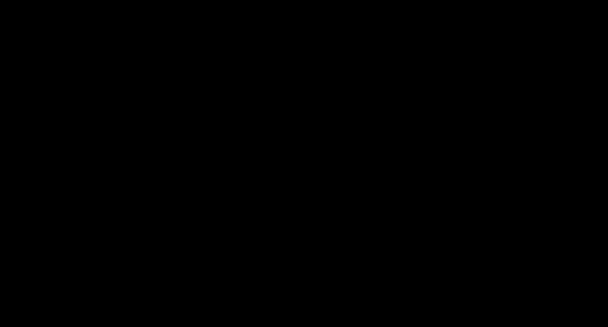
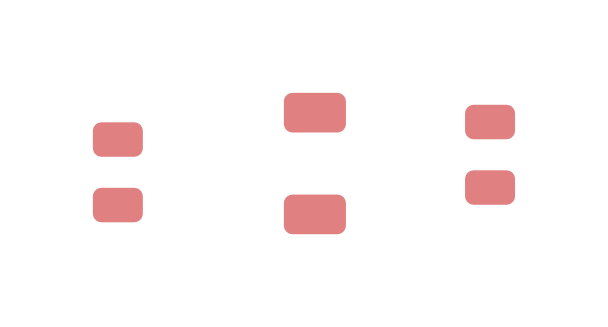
part: none -> (490, 154)
part: none -> (314, 163)
part: none -> (117, 172)

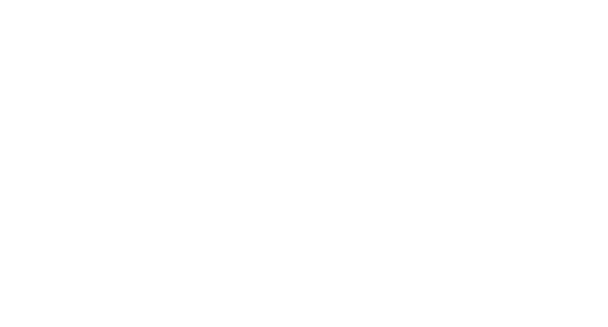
part: (490, 154) -> none
part: (314, 163) -> none
part: (117, 172) -> none

